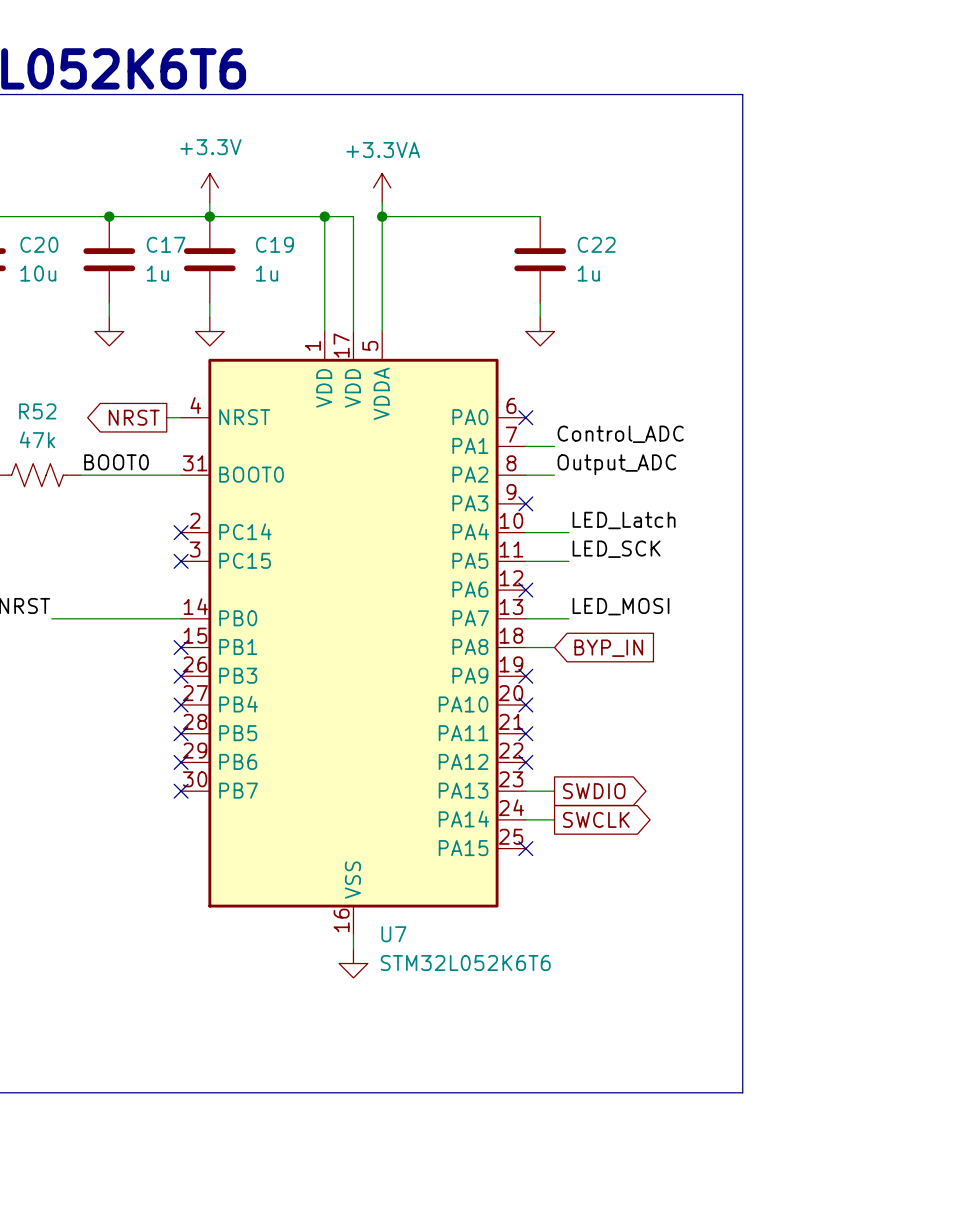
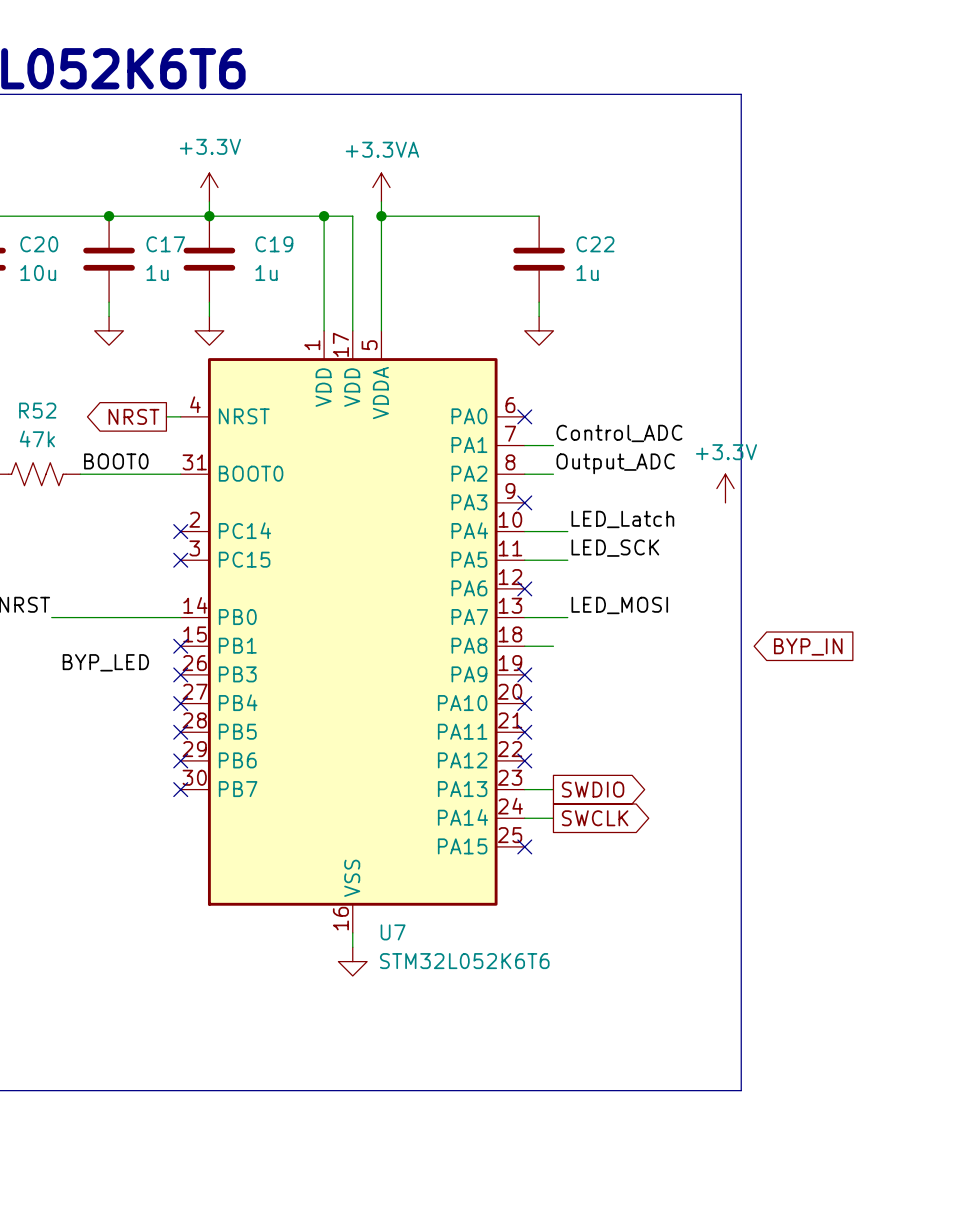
power symbol: none -> +3.3V (725, 488)
global label position: BYP_IN (608, 648) -> BYP_IN (808, 646)
label: none -> BYP_LED (105, 662)

